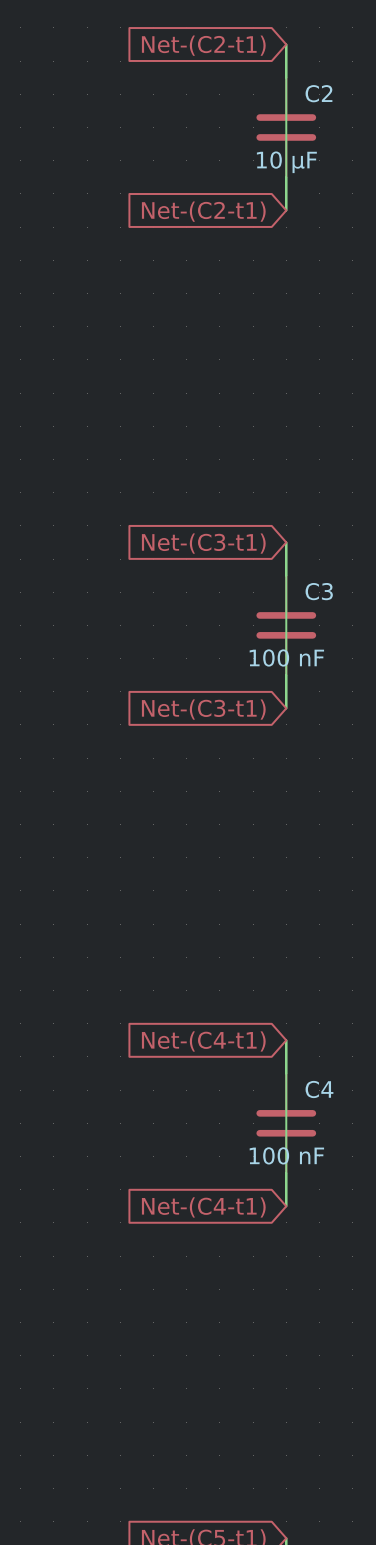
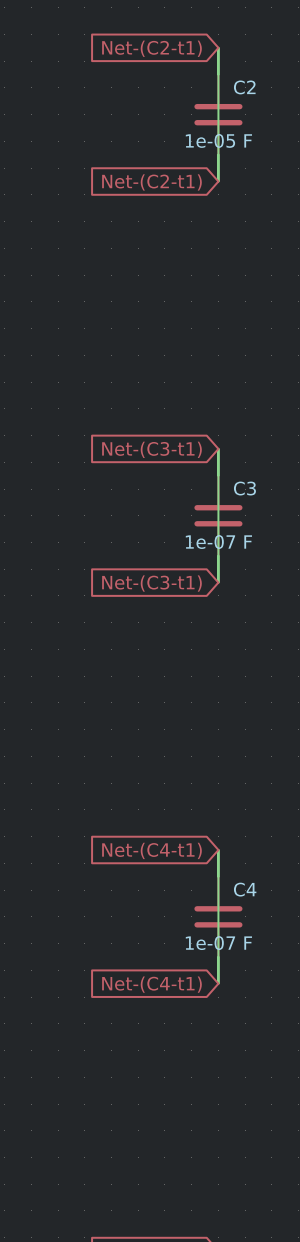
C2 value: 10 µF (286, 162) -> 1e-05 F (218, 140)
C3 value: 100 nF (286, 657) -> 1e-07 F (218, 542)
C4 value: 100 nF (286, 1155) -> 1e-07 F (218, 943)

